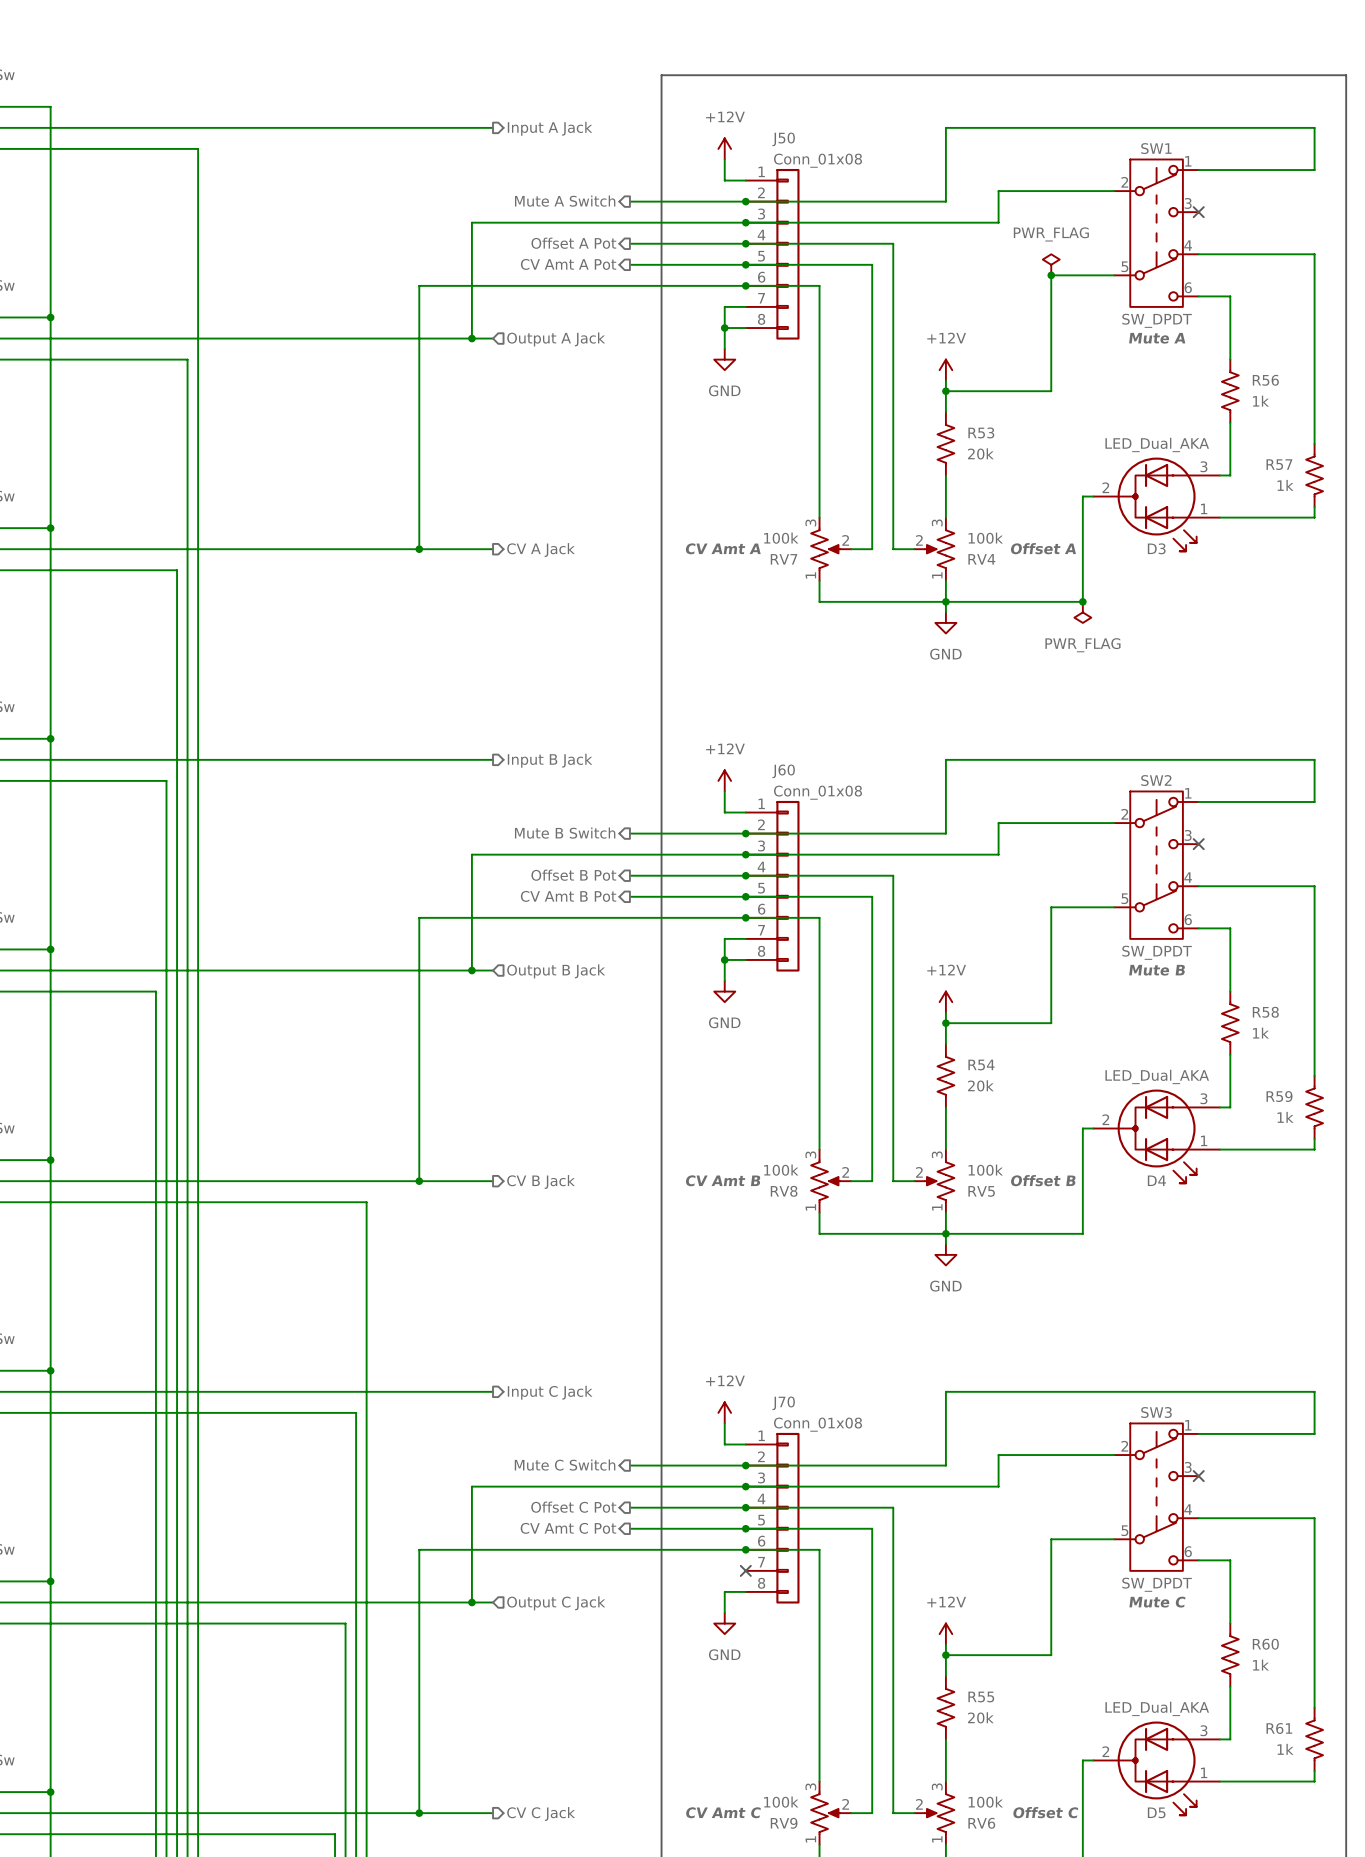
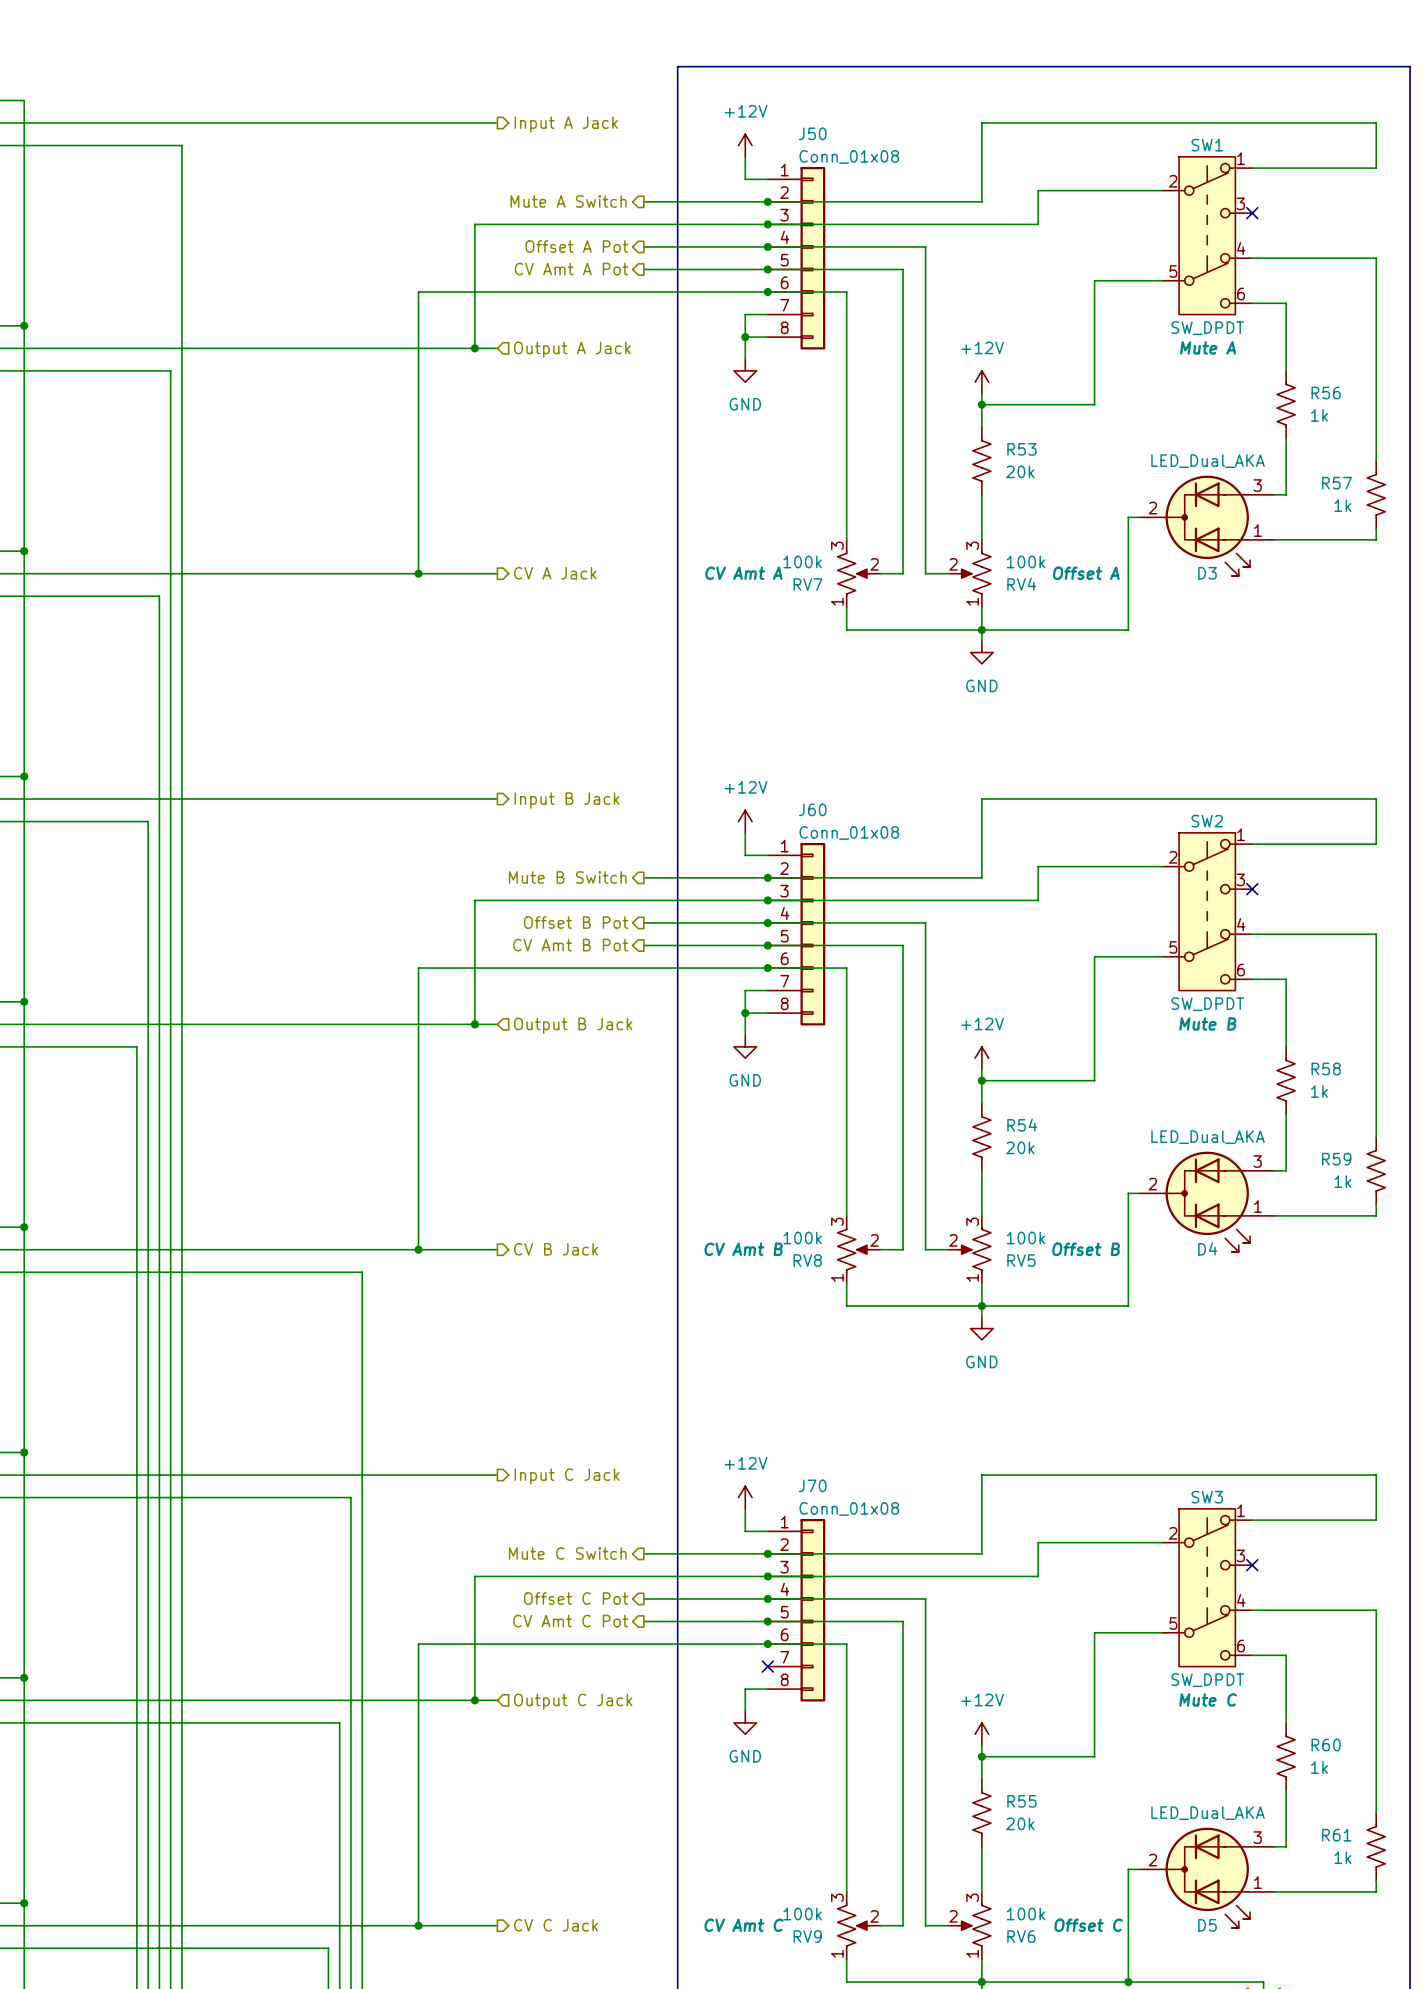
power symbol: PWR_FLAG (1051, 264) -> none
junction: (1051, 275) -> none
junction: (1082, 601) -> none
power symbol: PWR_FLAG (1082, 612) -> none

